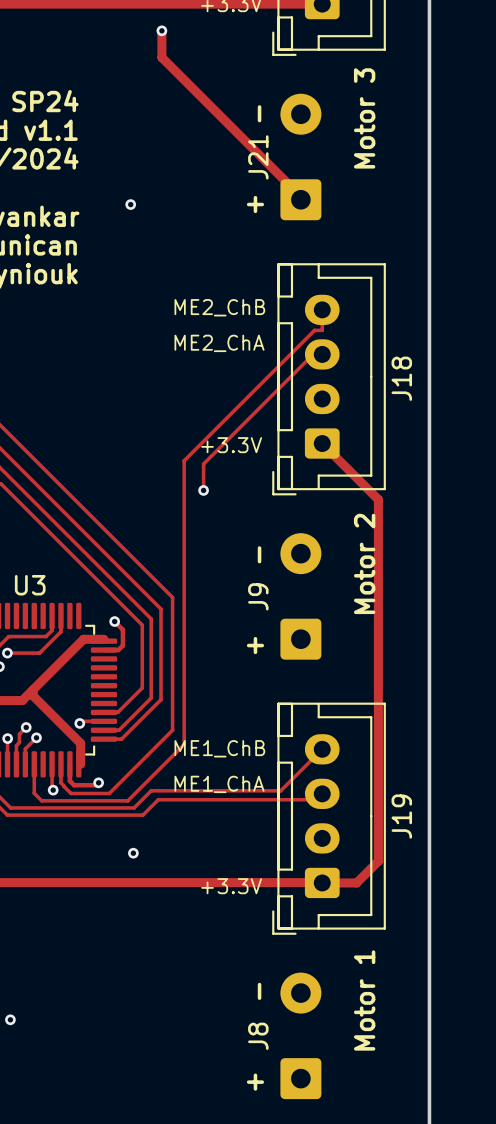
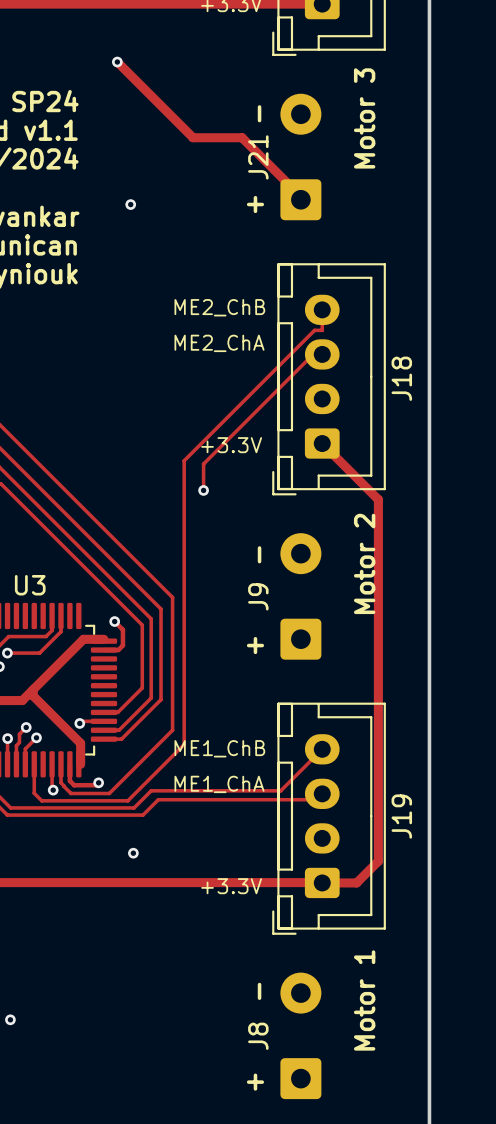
track: (161, 30) (161, 57) (242, 137) -> (117, 62) (193, 137) (242, 137)
via: (161, 30) -> none
via: none -> (117, 62)

